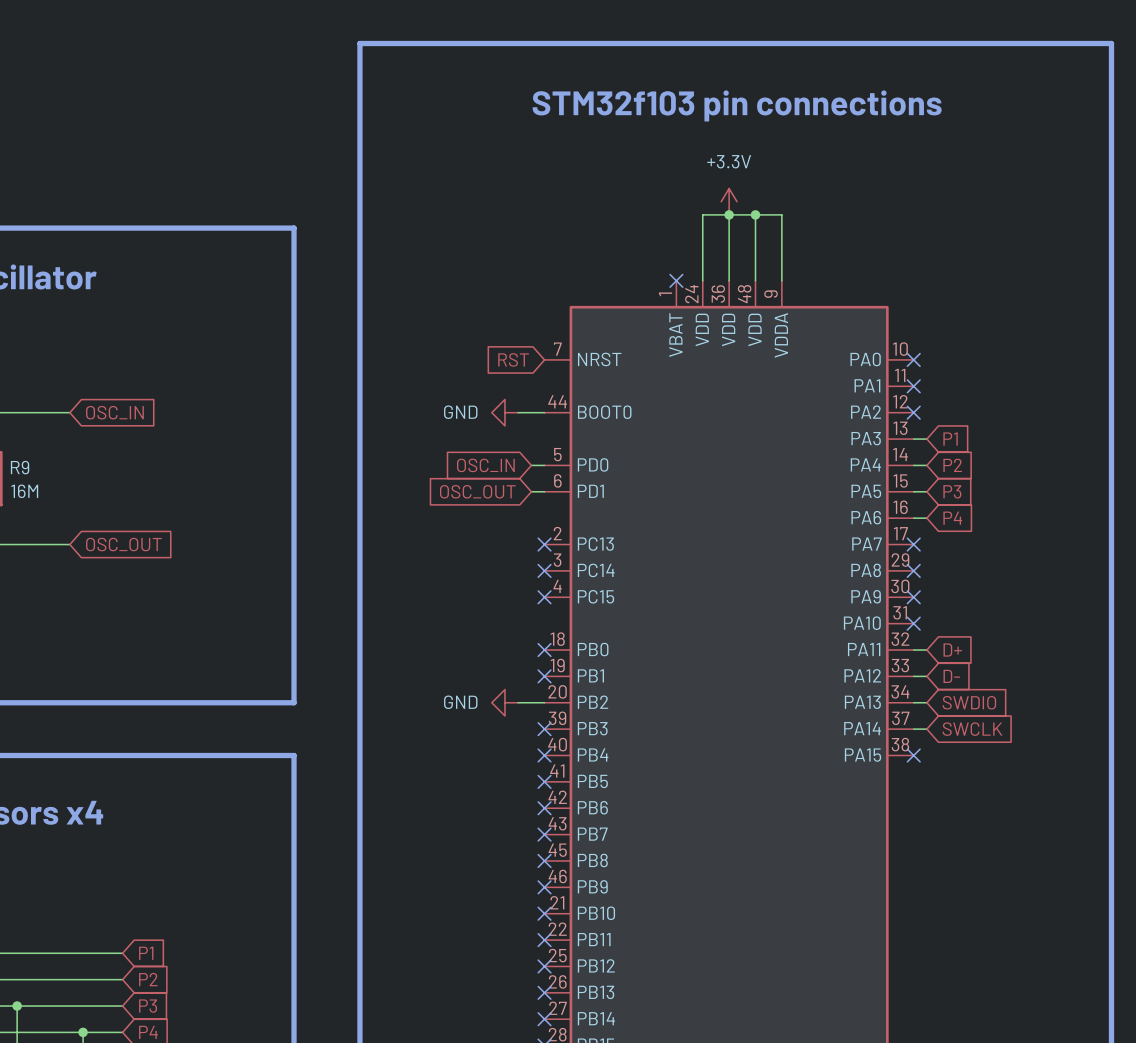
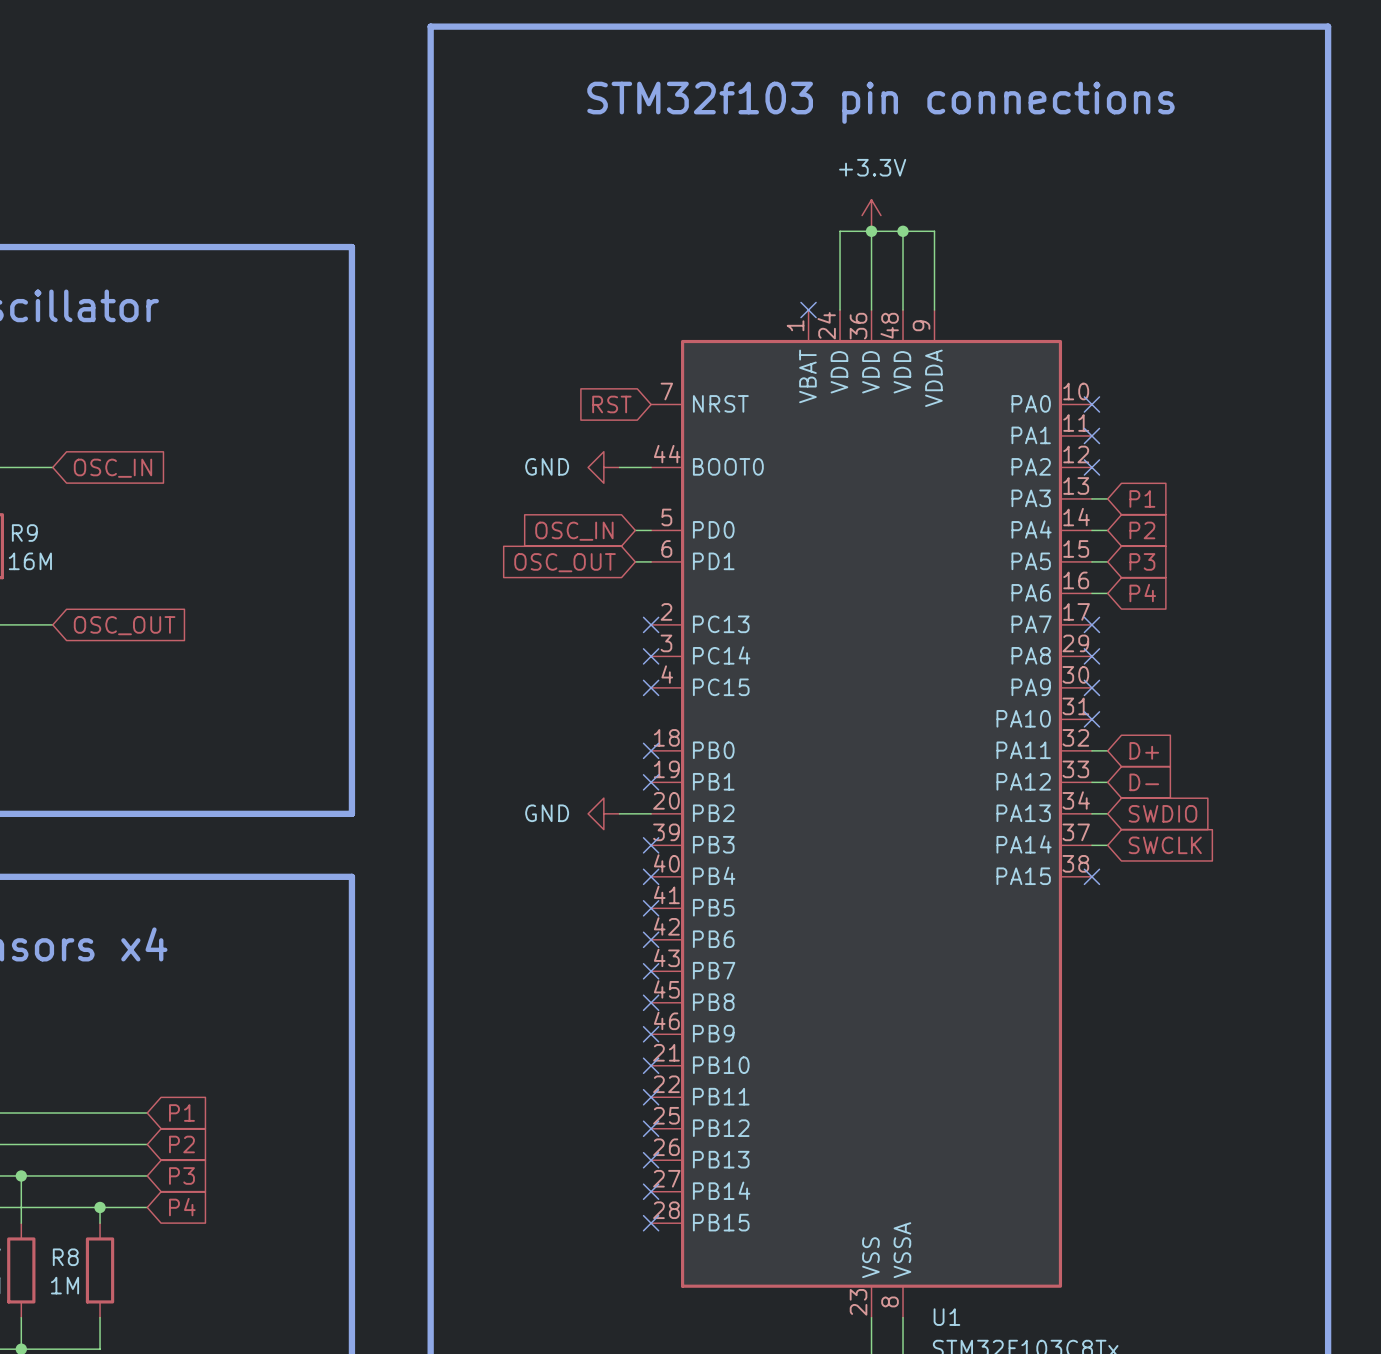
wire: (43, 412) (69, 412) -> none
global label position: OSC_IN (114, 412) -> OSC_IN (112, 468)
wire: (43, 544) (69, 544) -> none
global label position: OSC_OUT (123, 544) -> OSC_OUT (124, 625)

